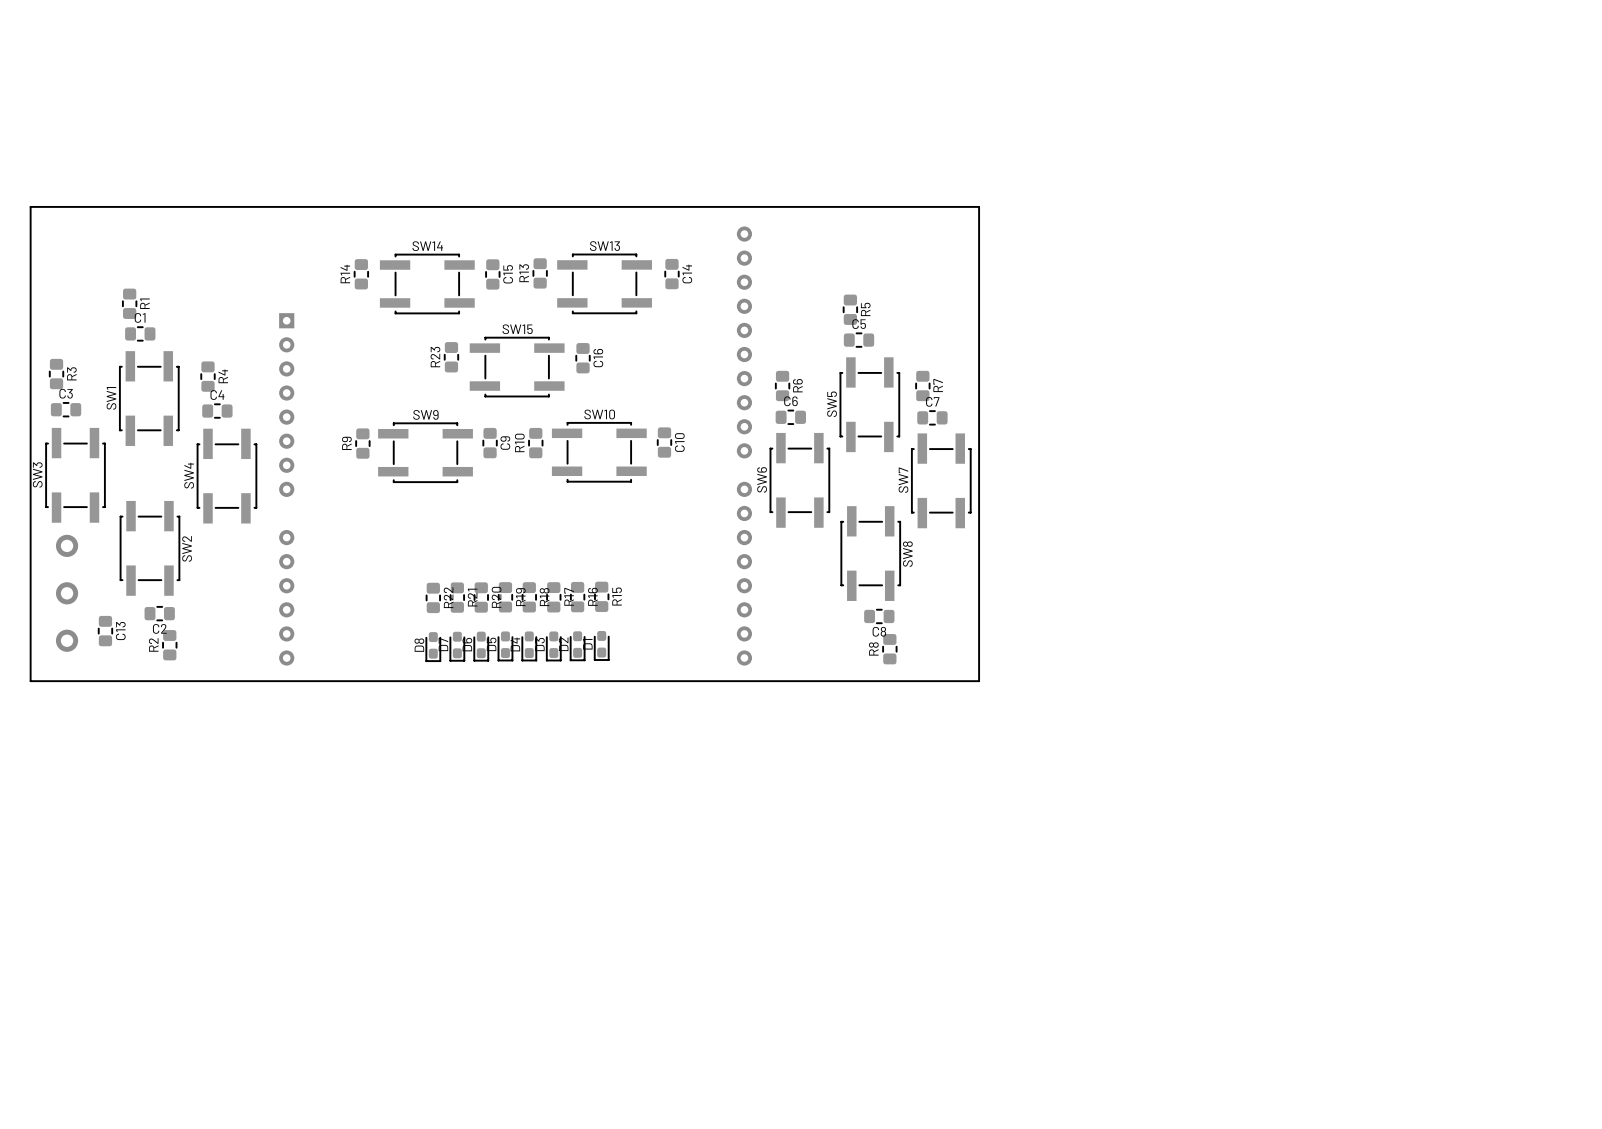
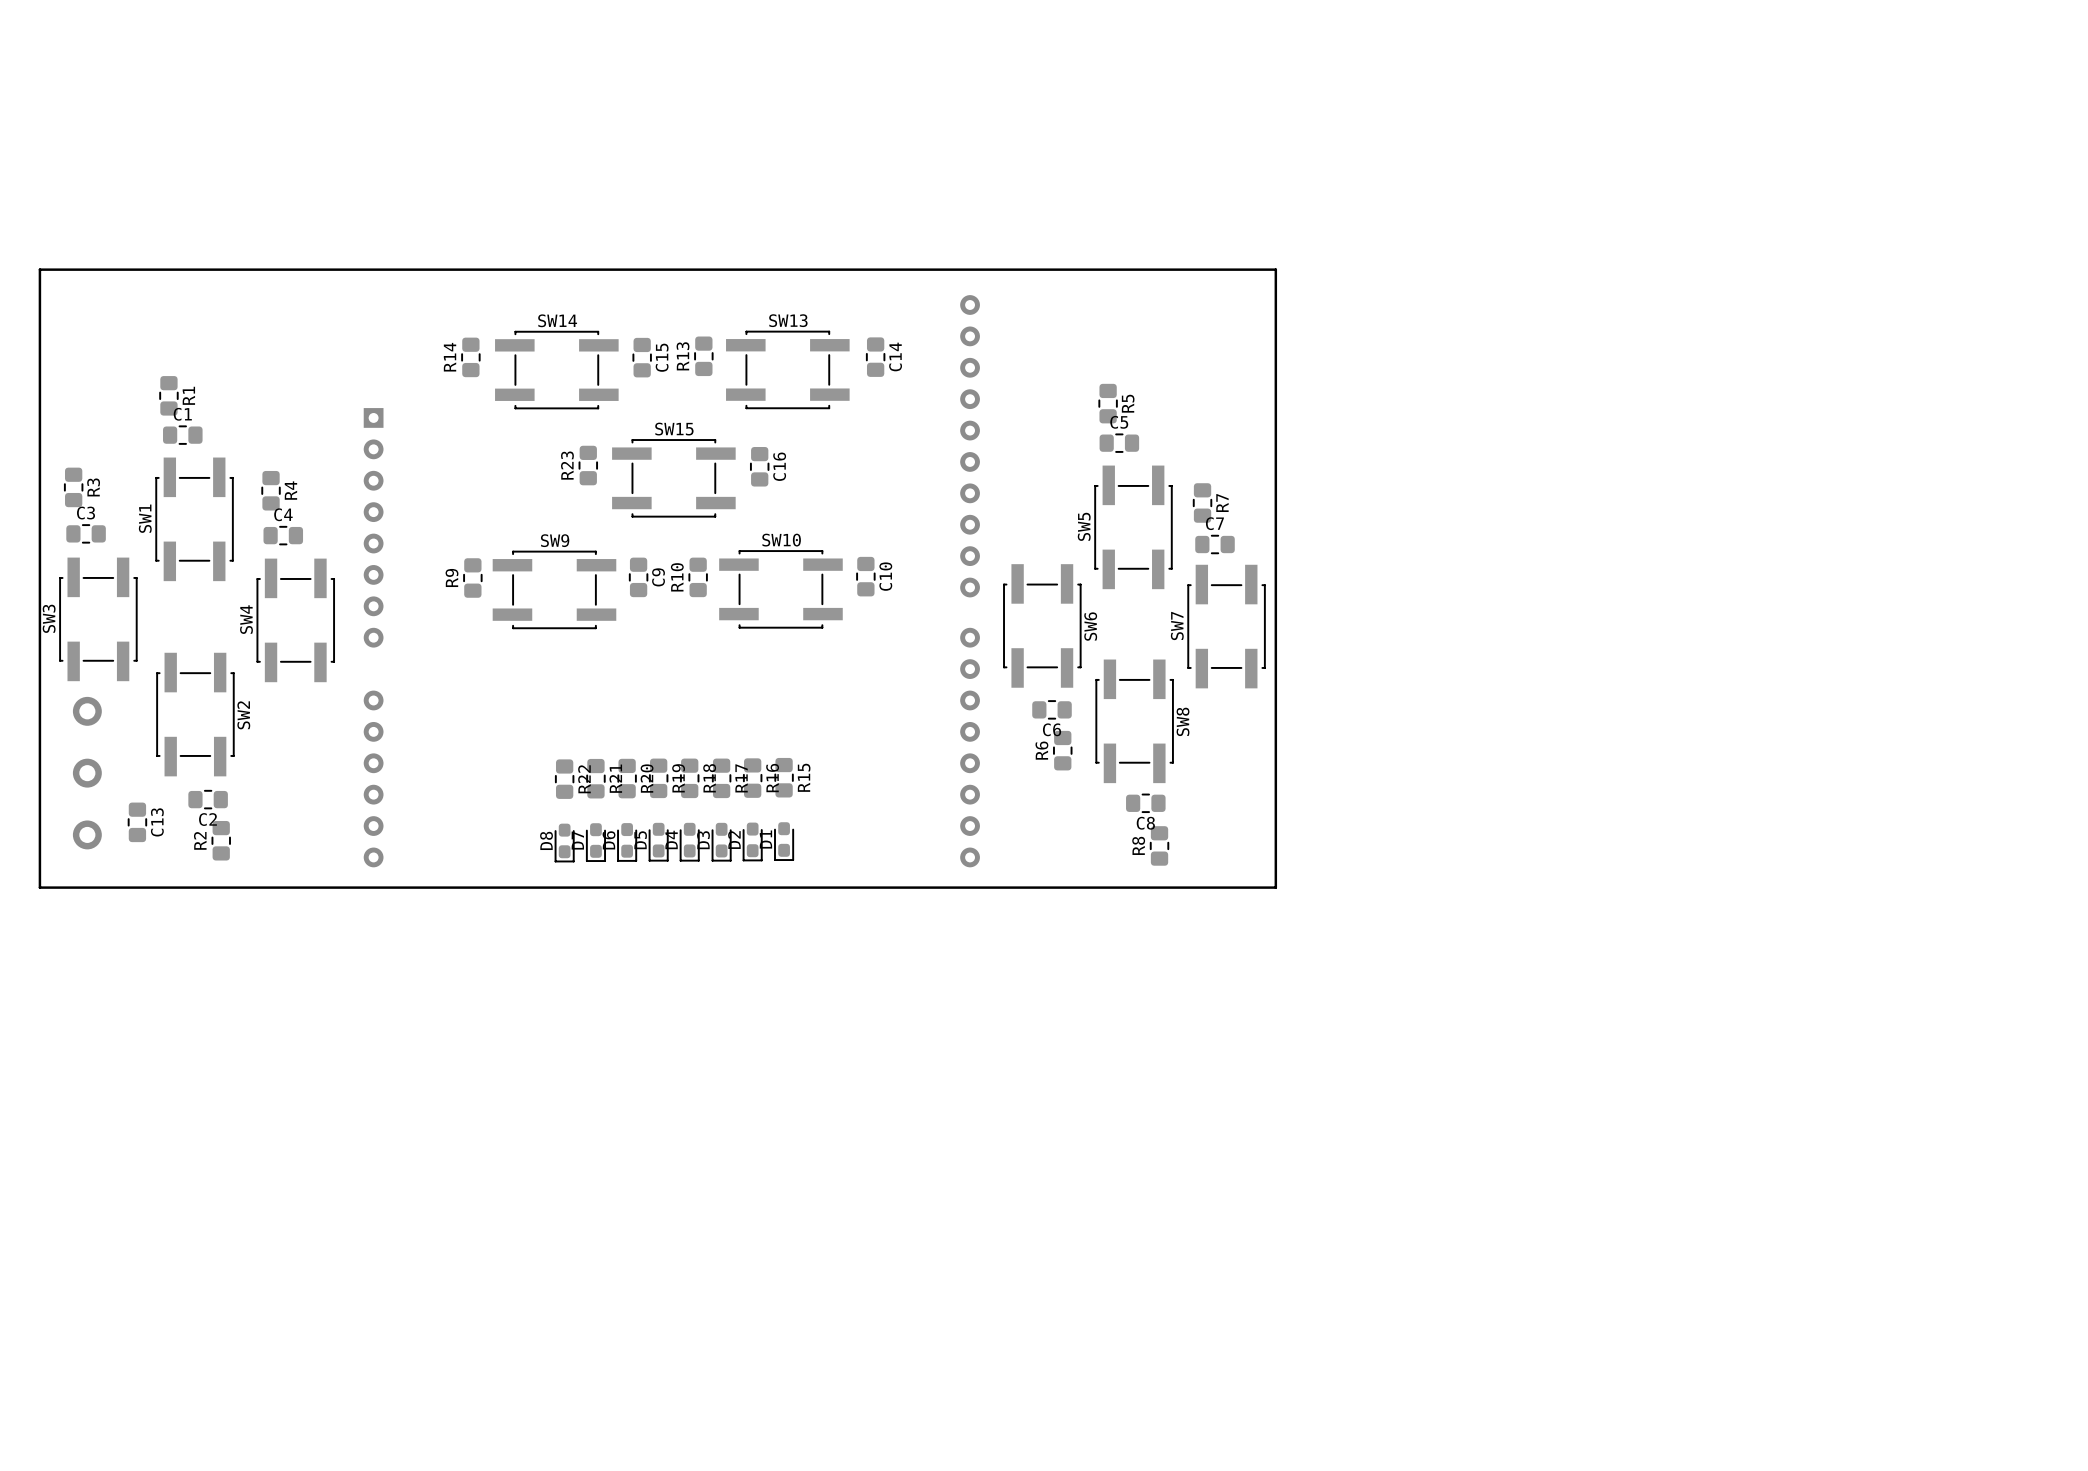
R6 name position: R6 (797, 385) -> R6 (1041, 750)
R6 position: (782, 386) -> (1062, 750)
C6 name position: C6 (790, 401) -> C6 (1052, 729)
C6 position: (790, 417) -> (1052, 709)
SW6 name position: SW6 (762, 479) -> SW6 (1090, 626)

